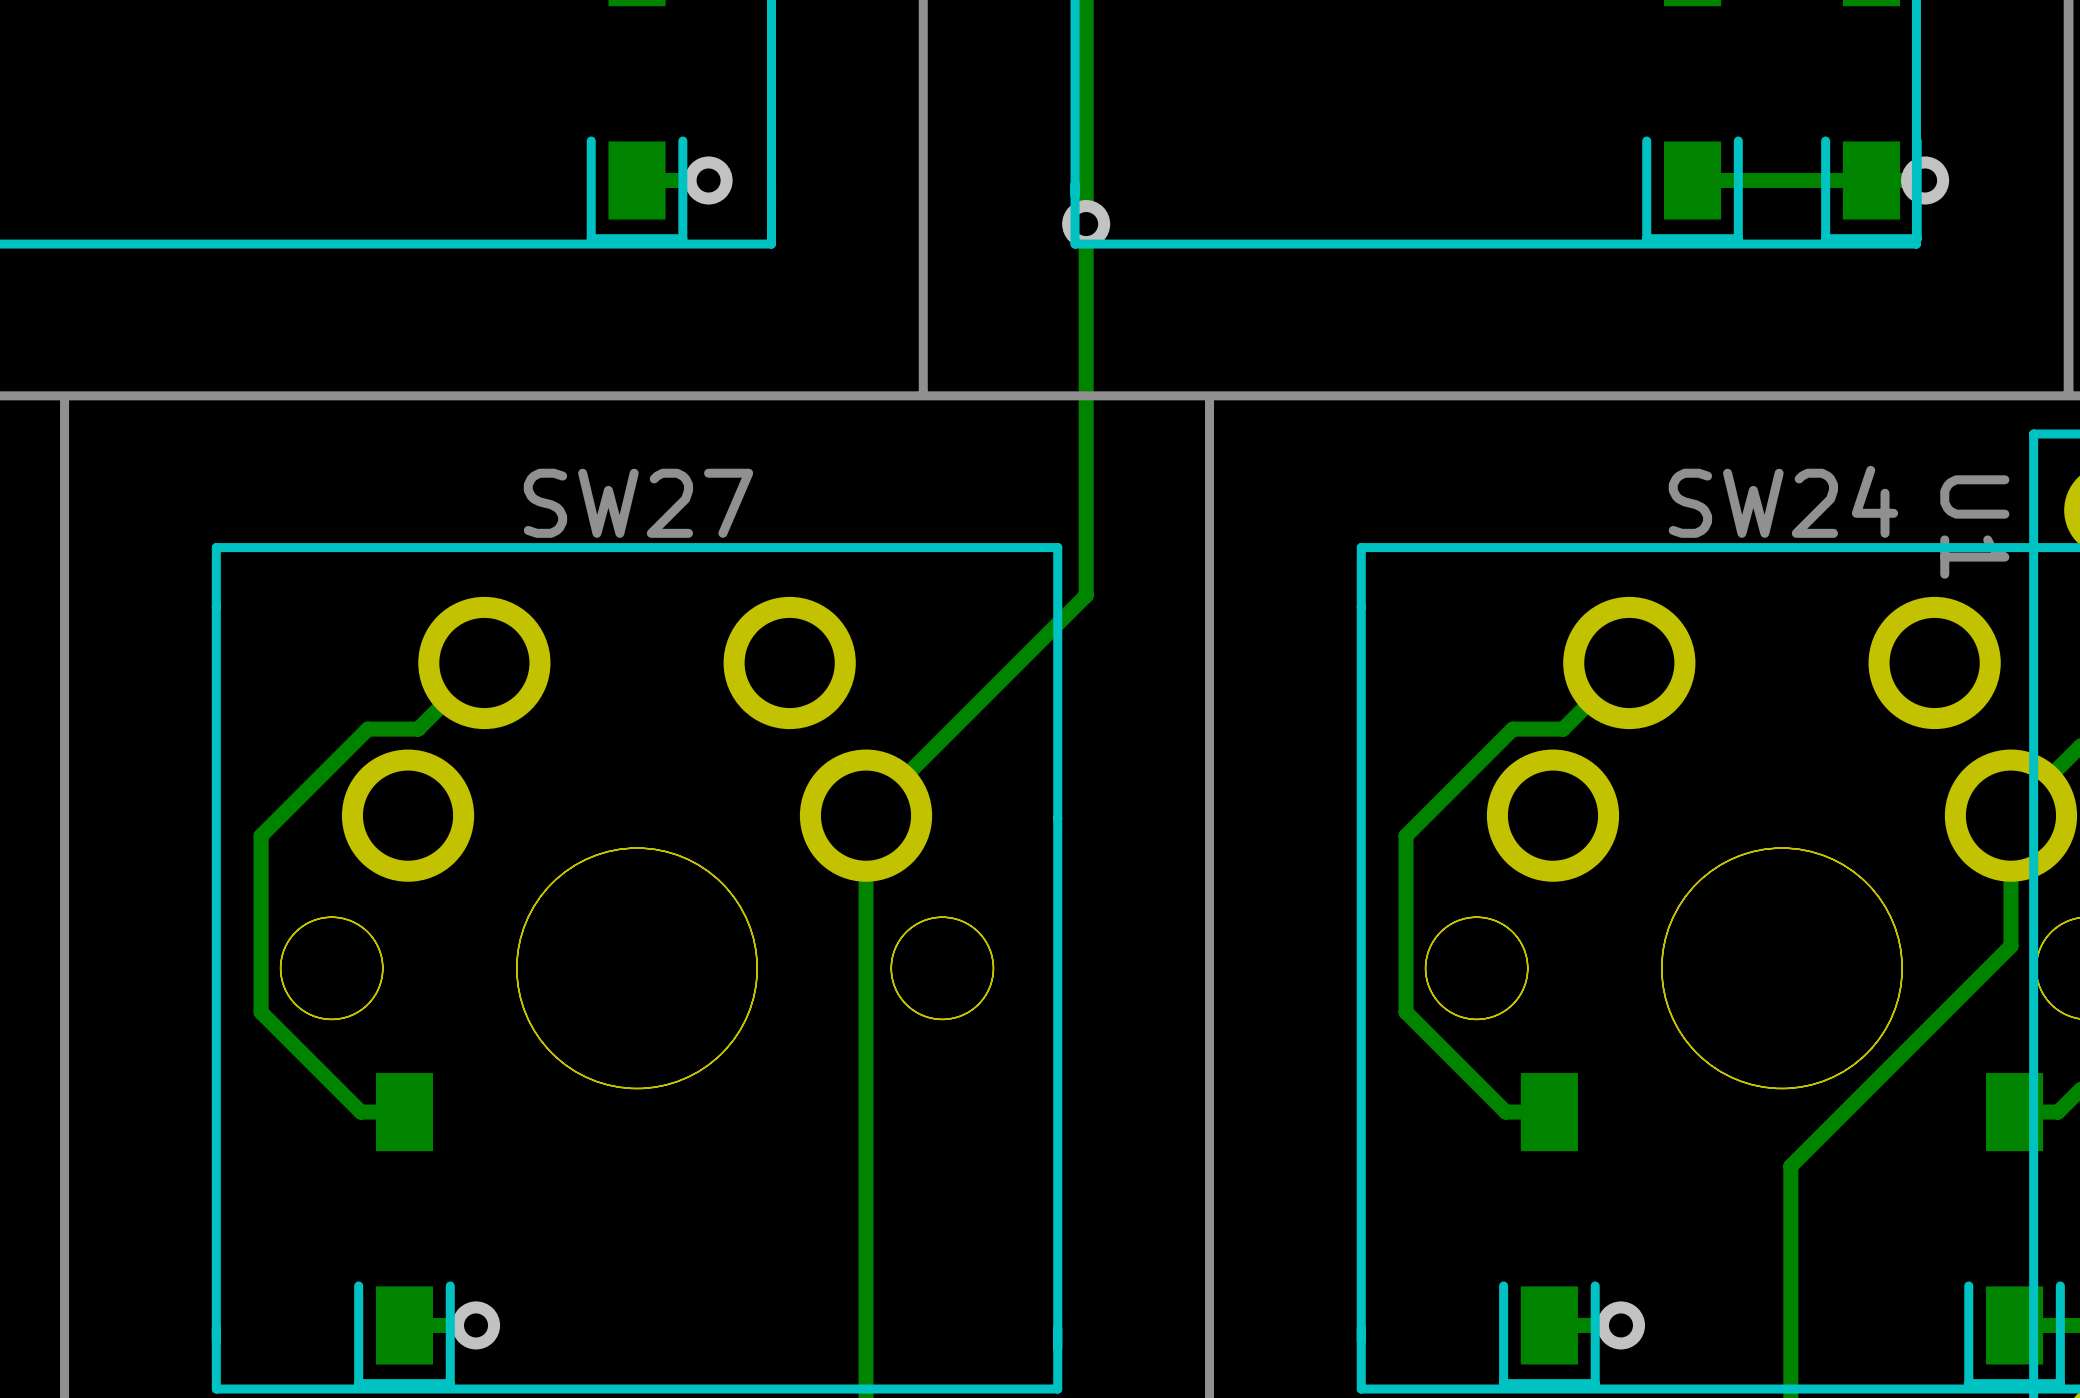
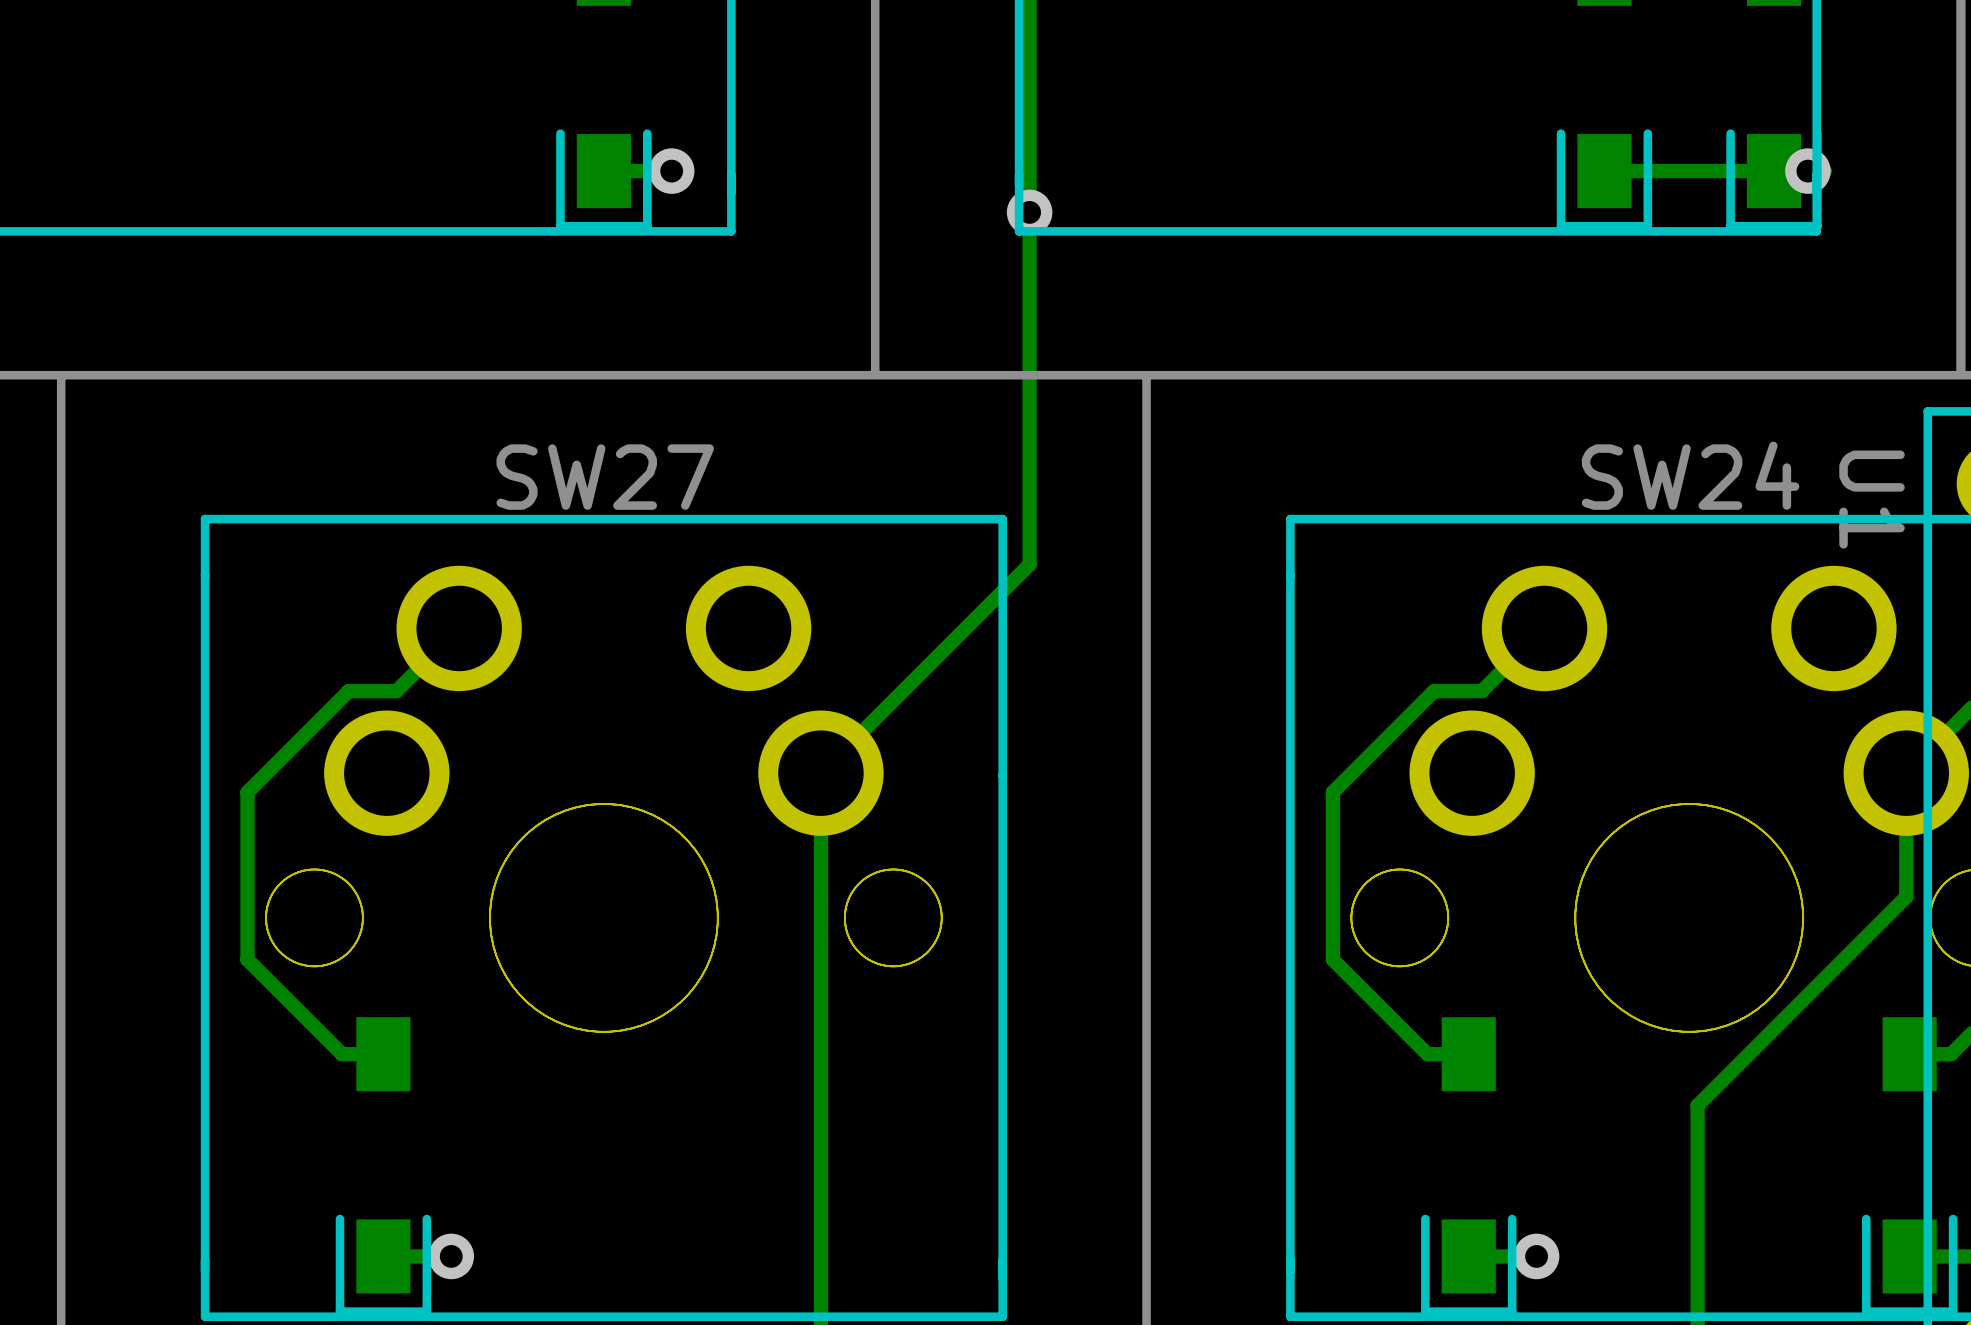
via position: (1925, 180) -> (1807, 171)

